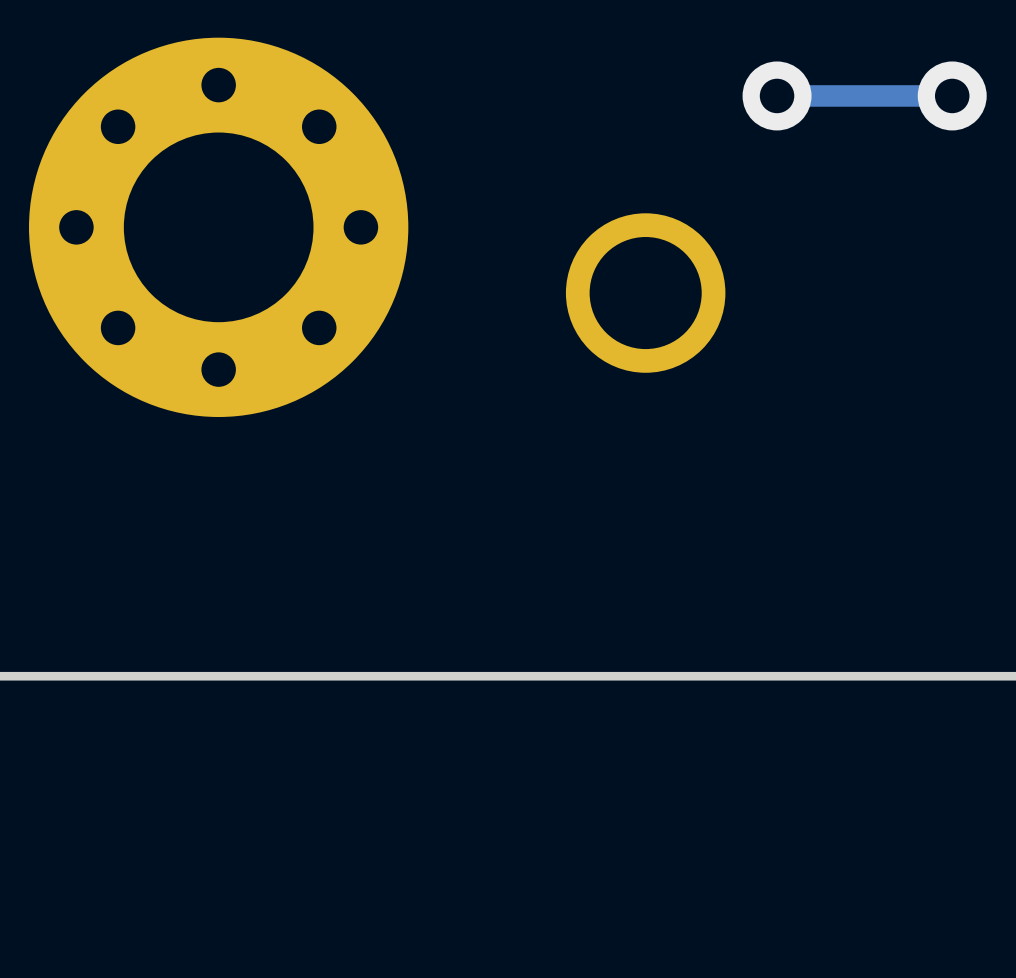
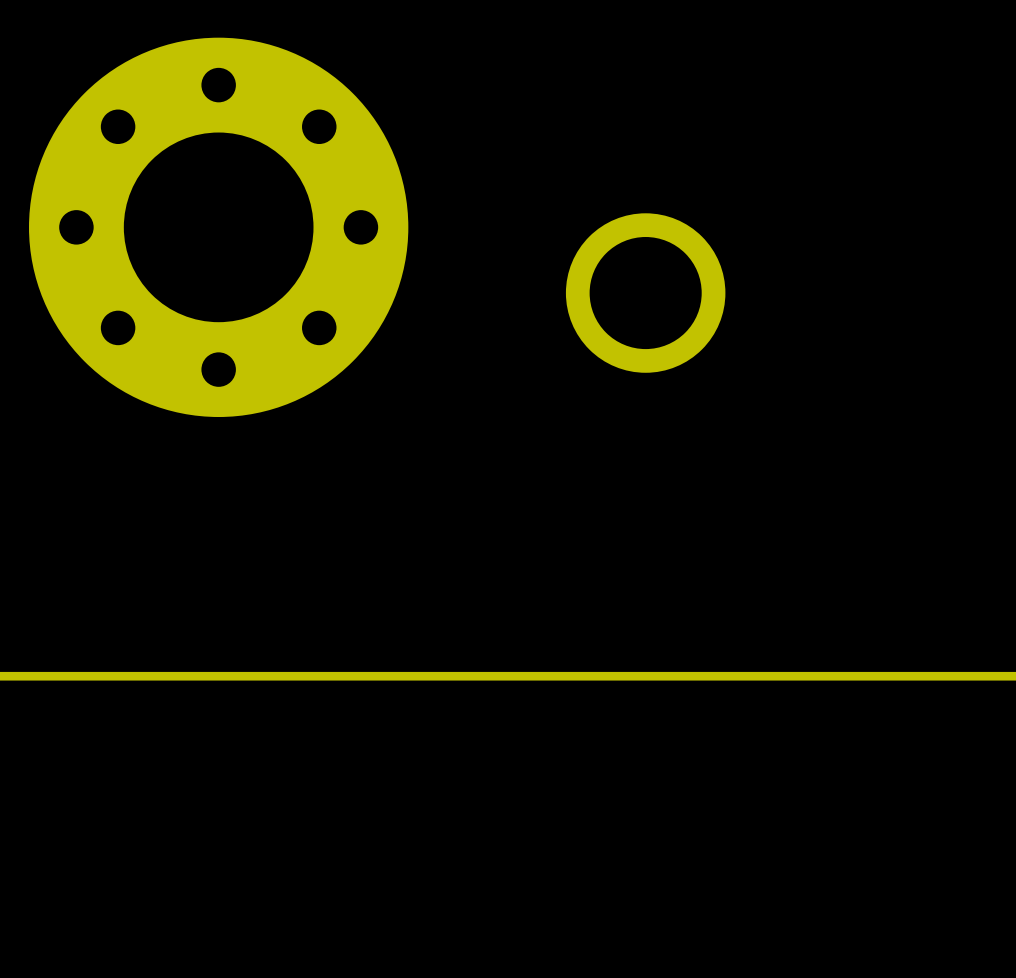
via: (777, 95) -> none
track: (952, 95) (777, 95) -> none
via: (952, 95) -> none

